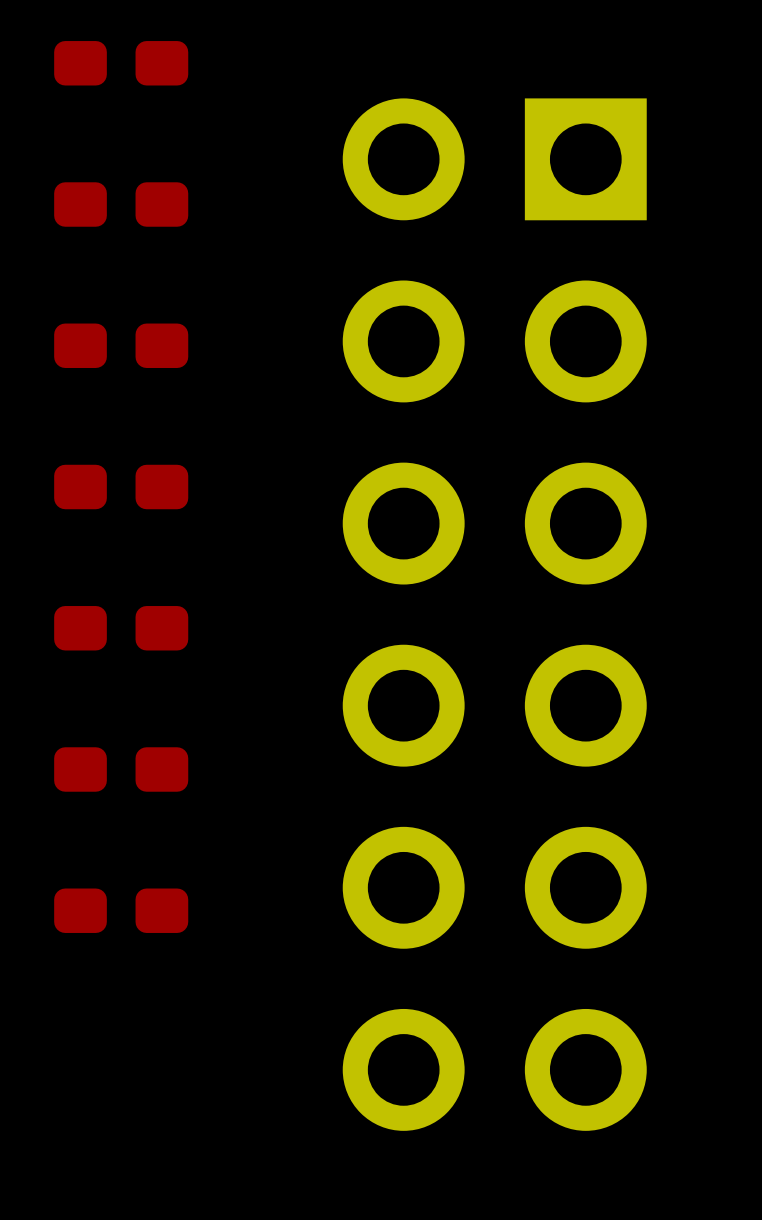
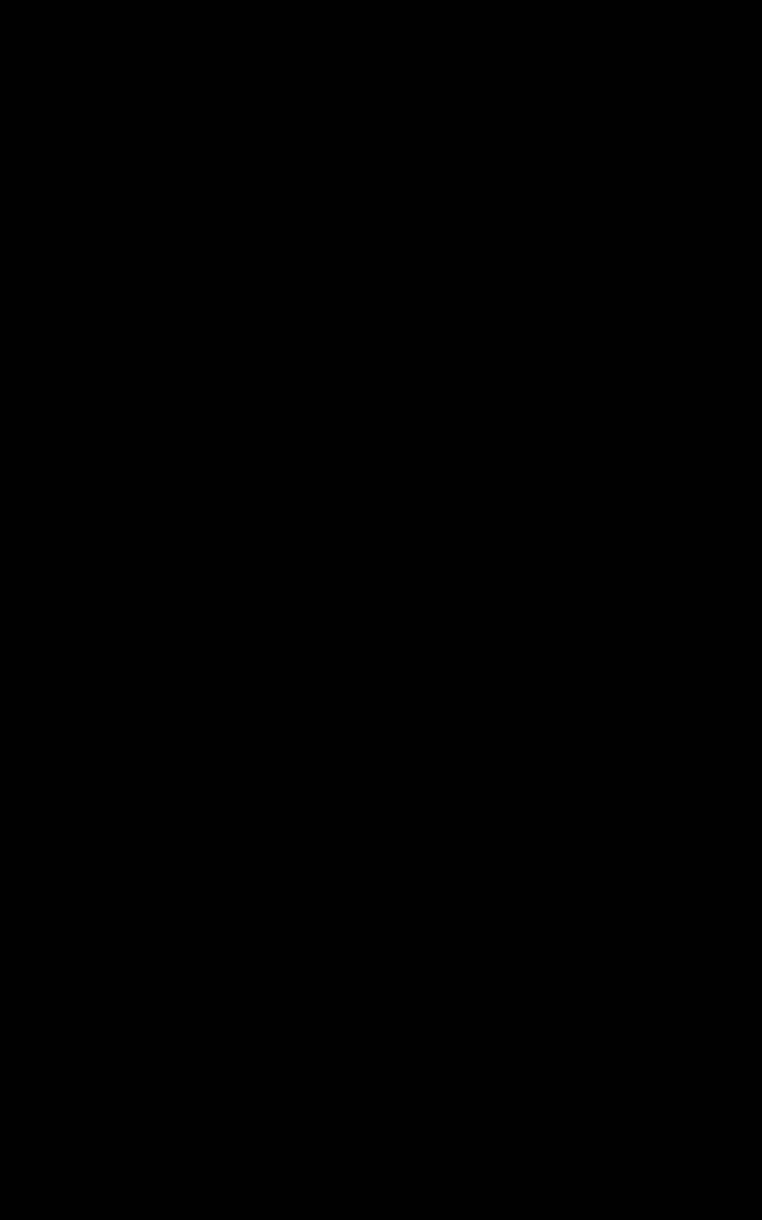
part: (121, 63) -> none
part: (121, 204) -> none
part: (121, 345) -> none
part: (121, 487) -> none
part: (494, 614) -> none
part: (121, 628) -> none
part: (121, 769) -> none
part: (121, 910) -> none

